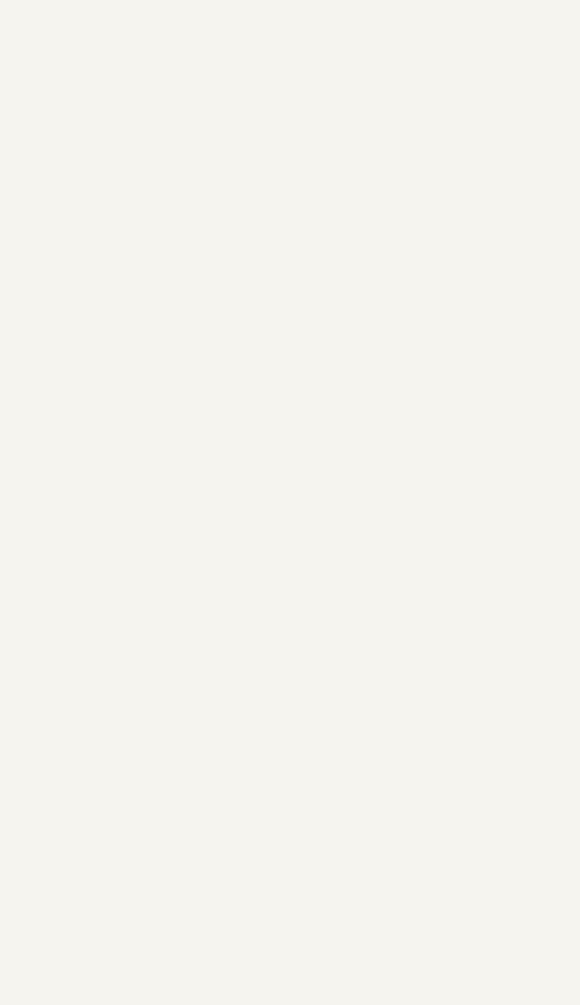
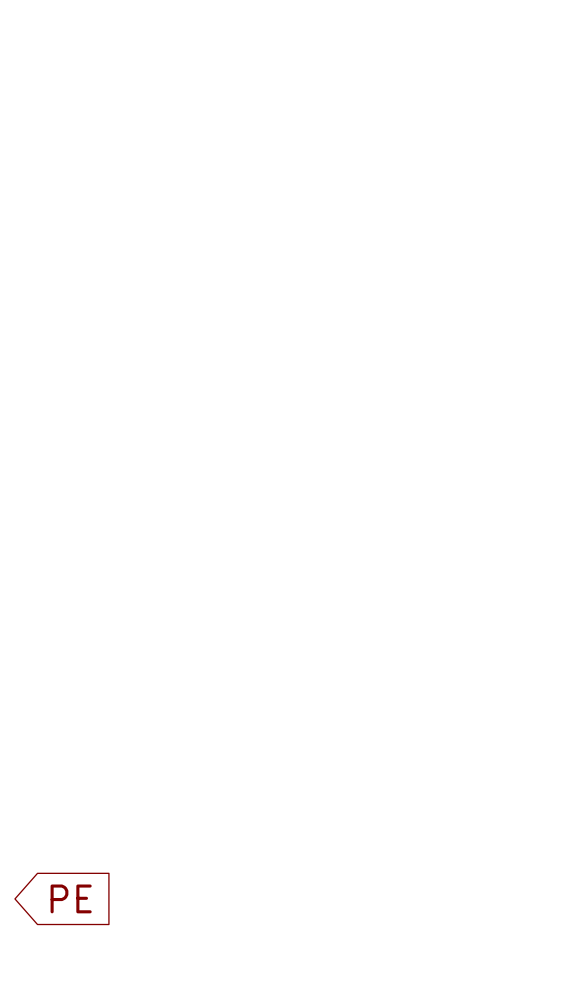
global label: none -> PE (71, 898)

